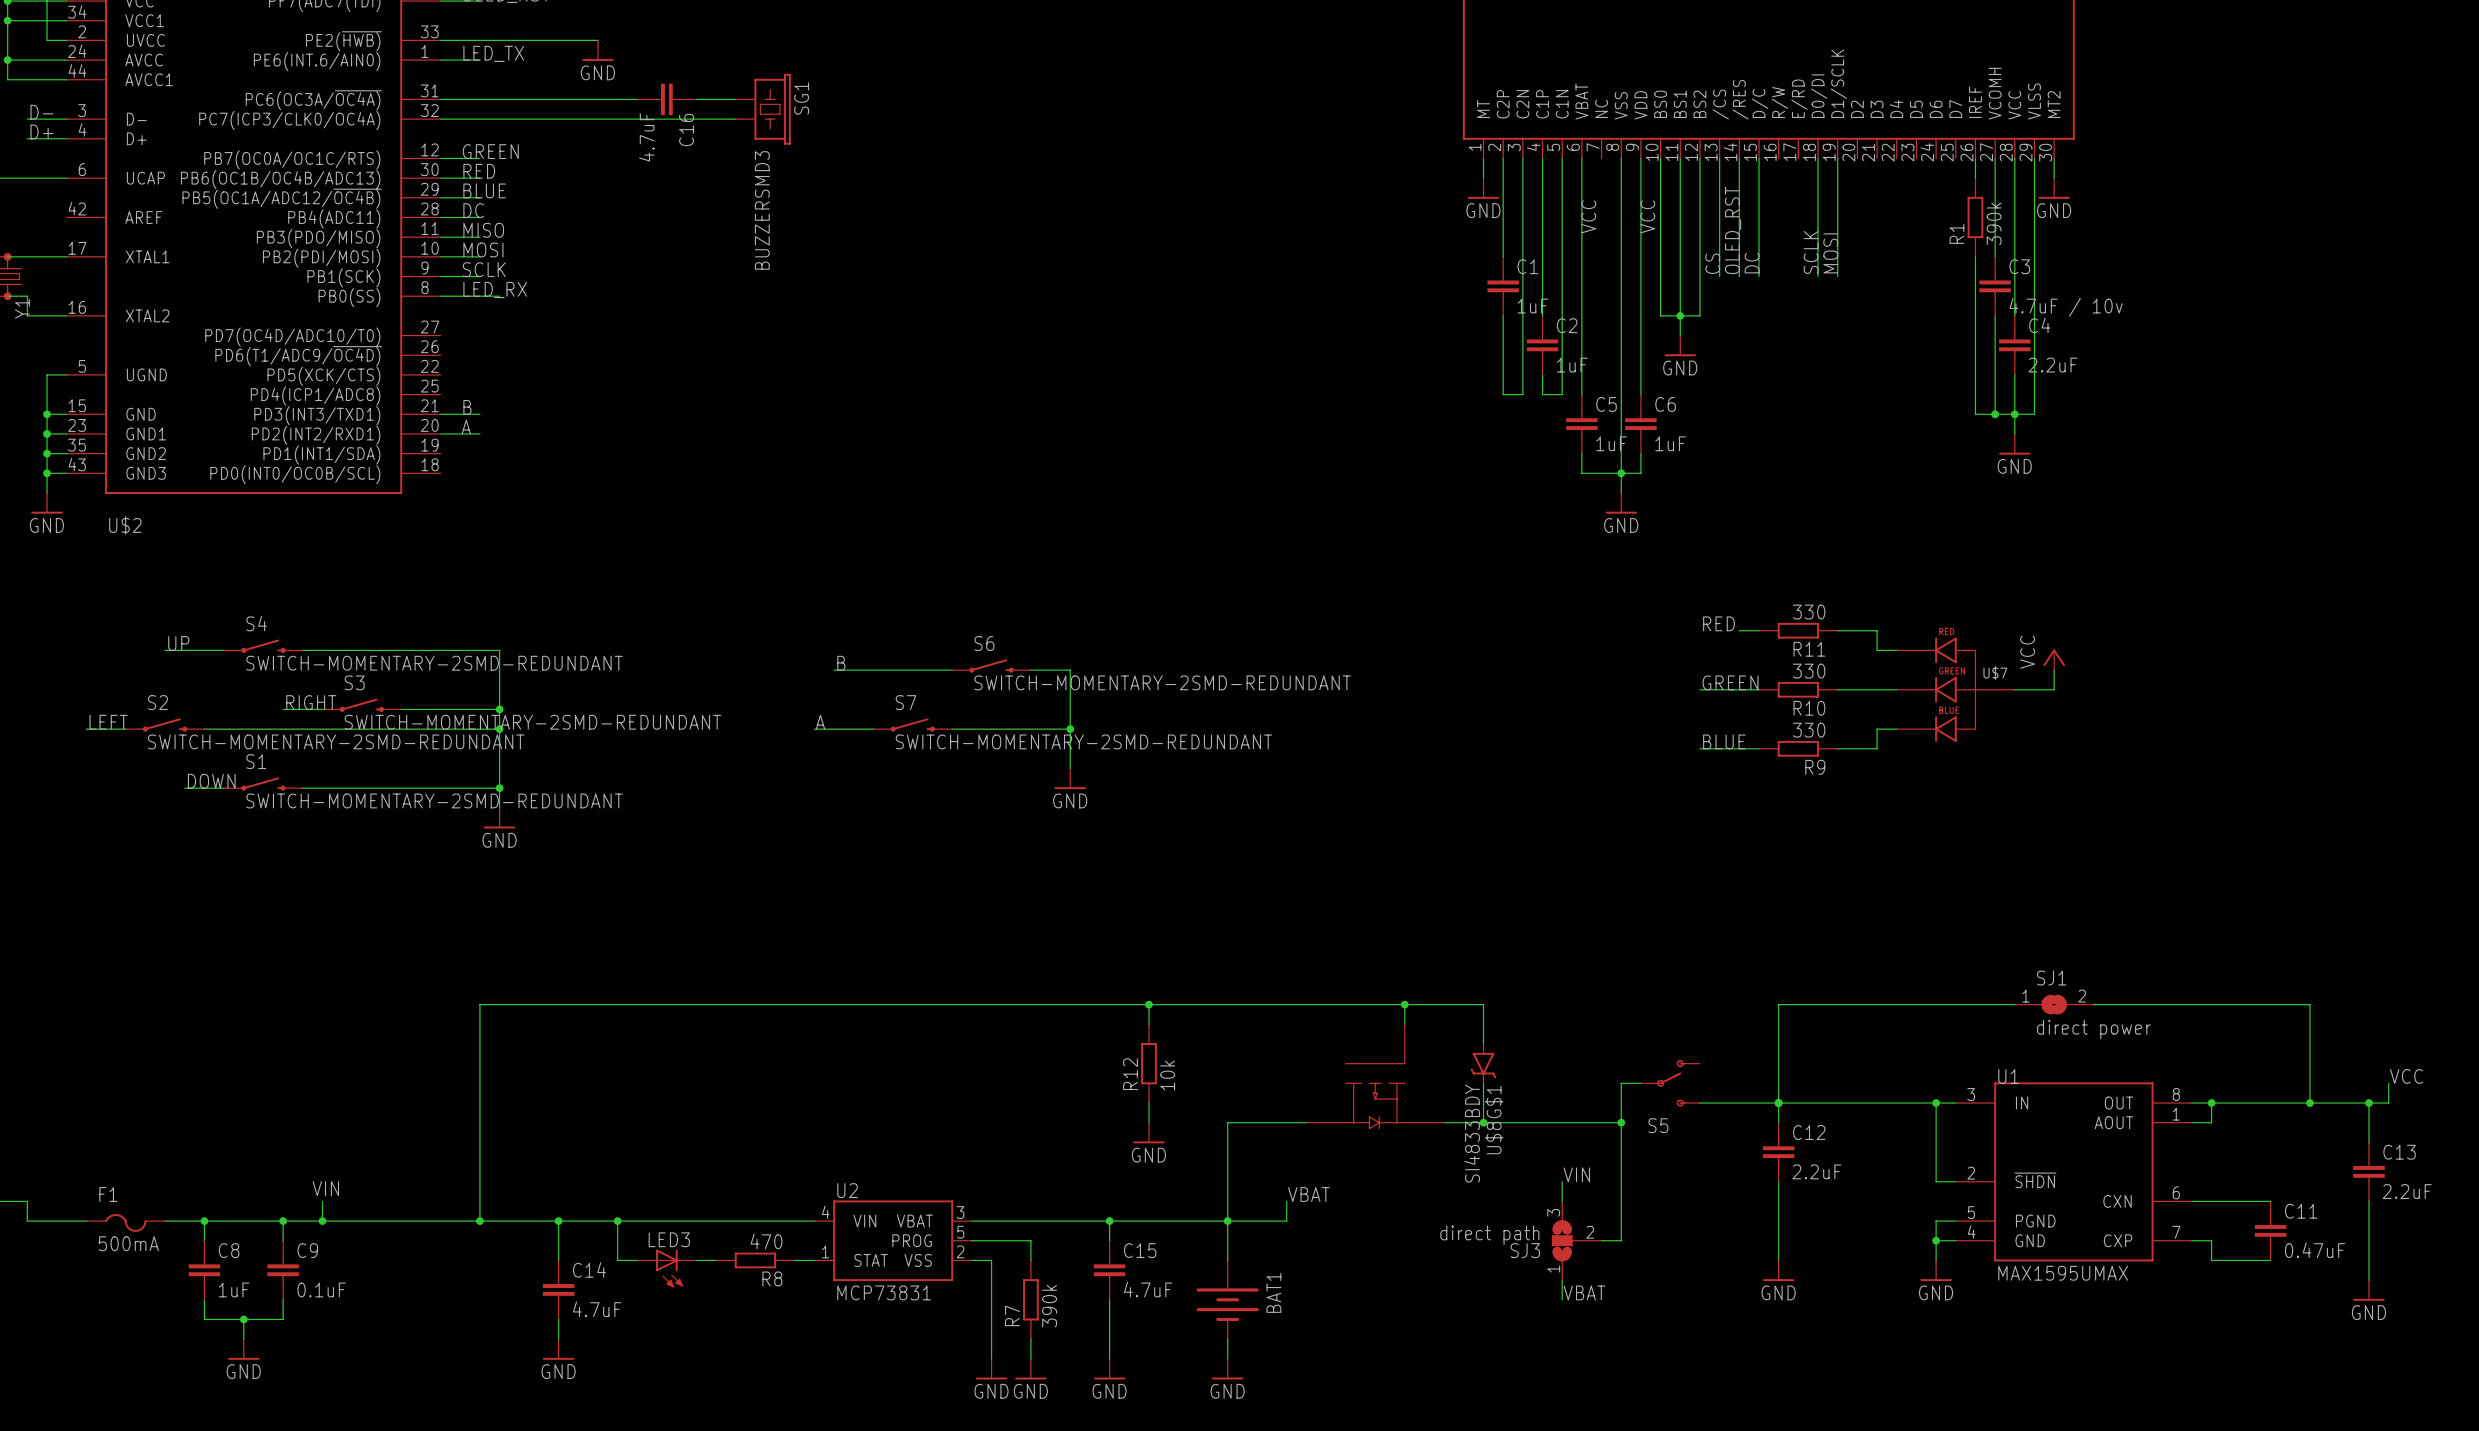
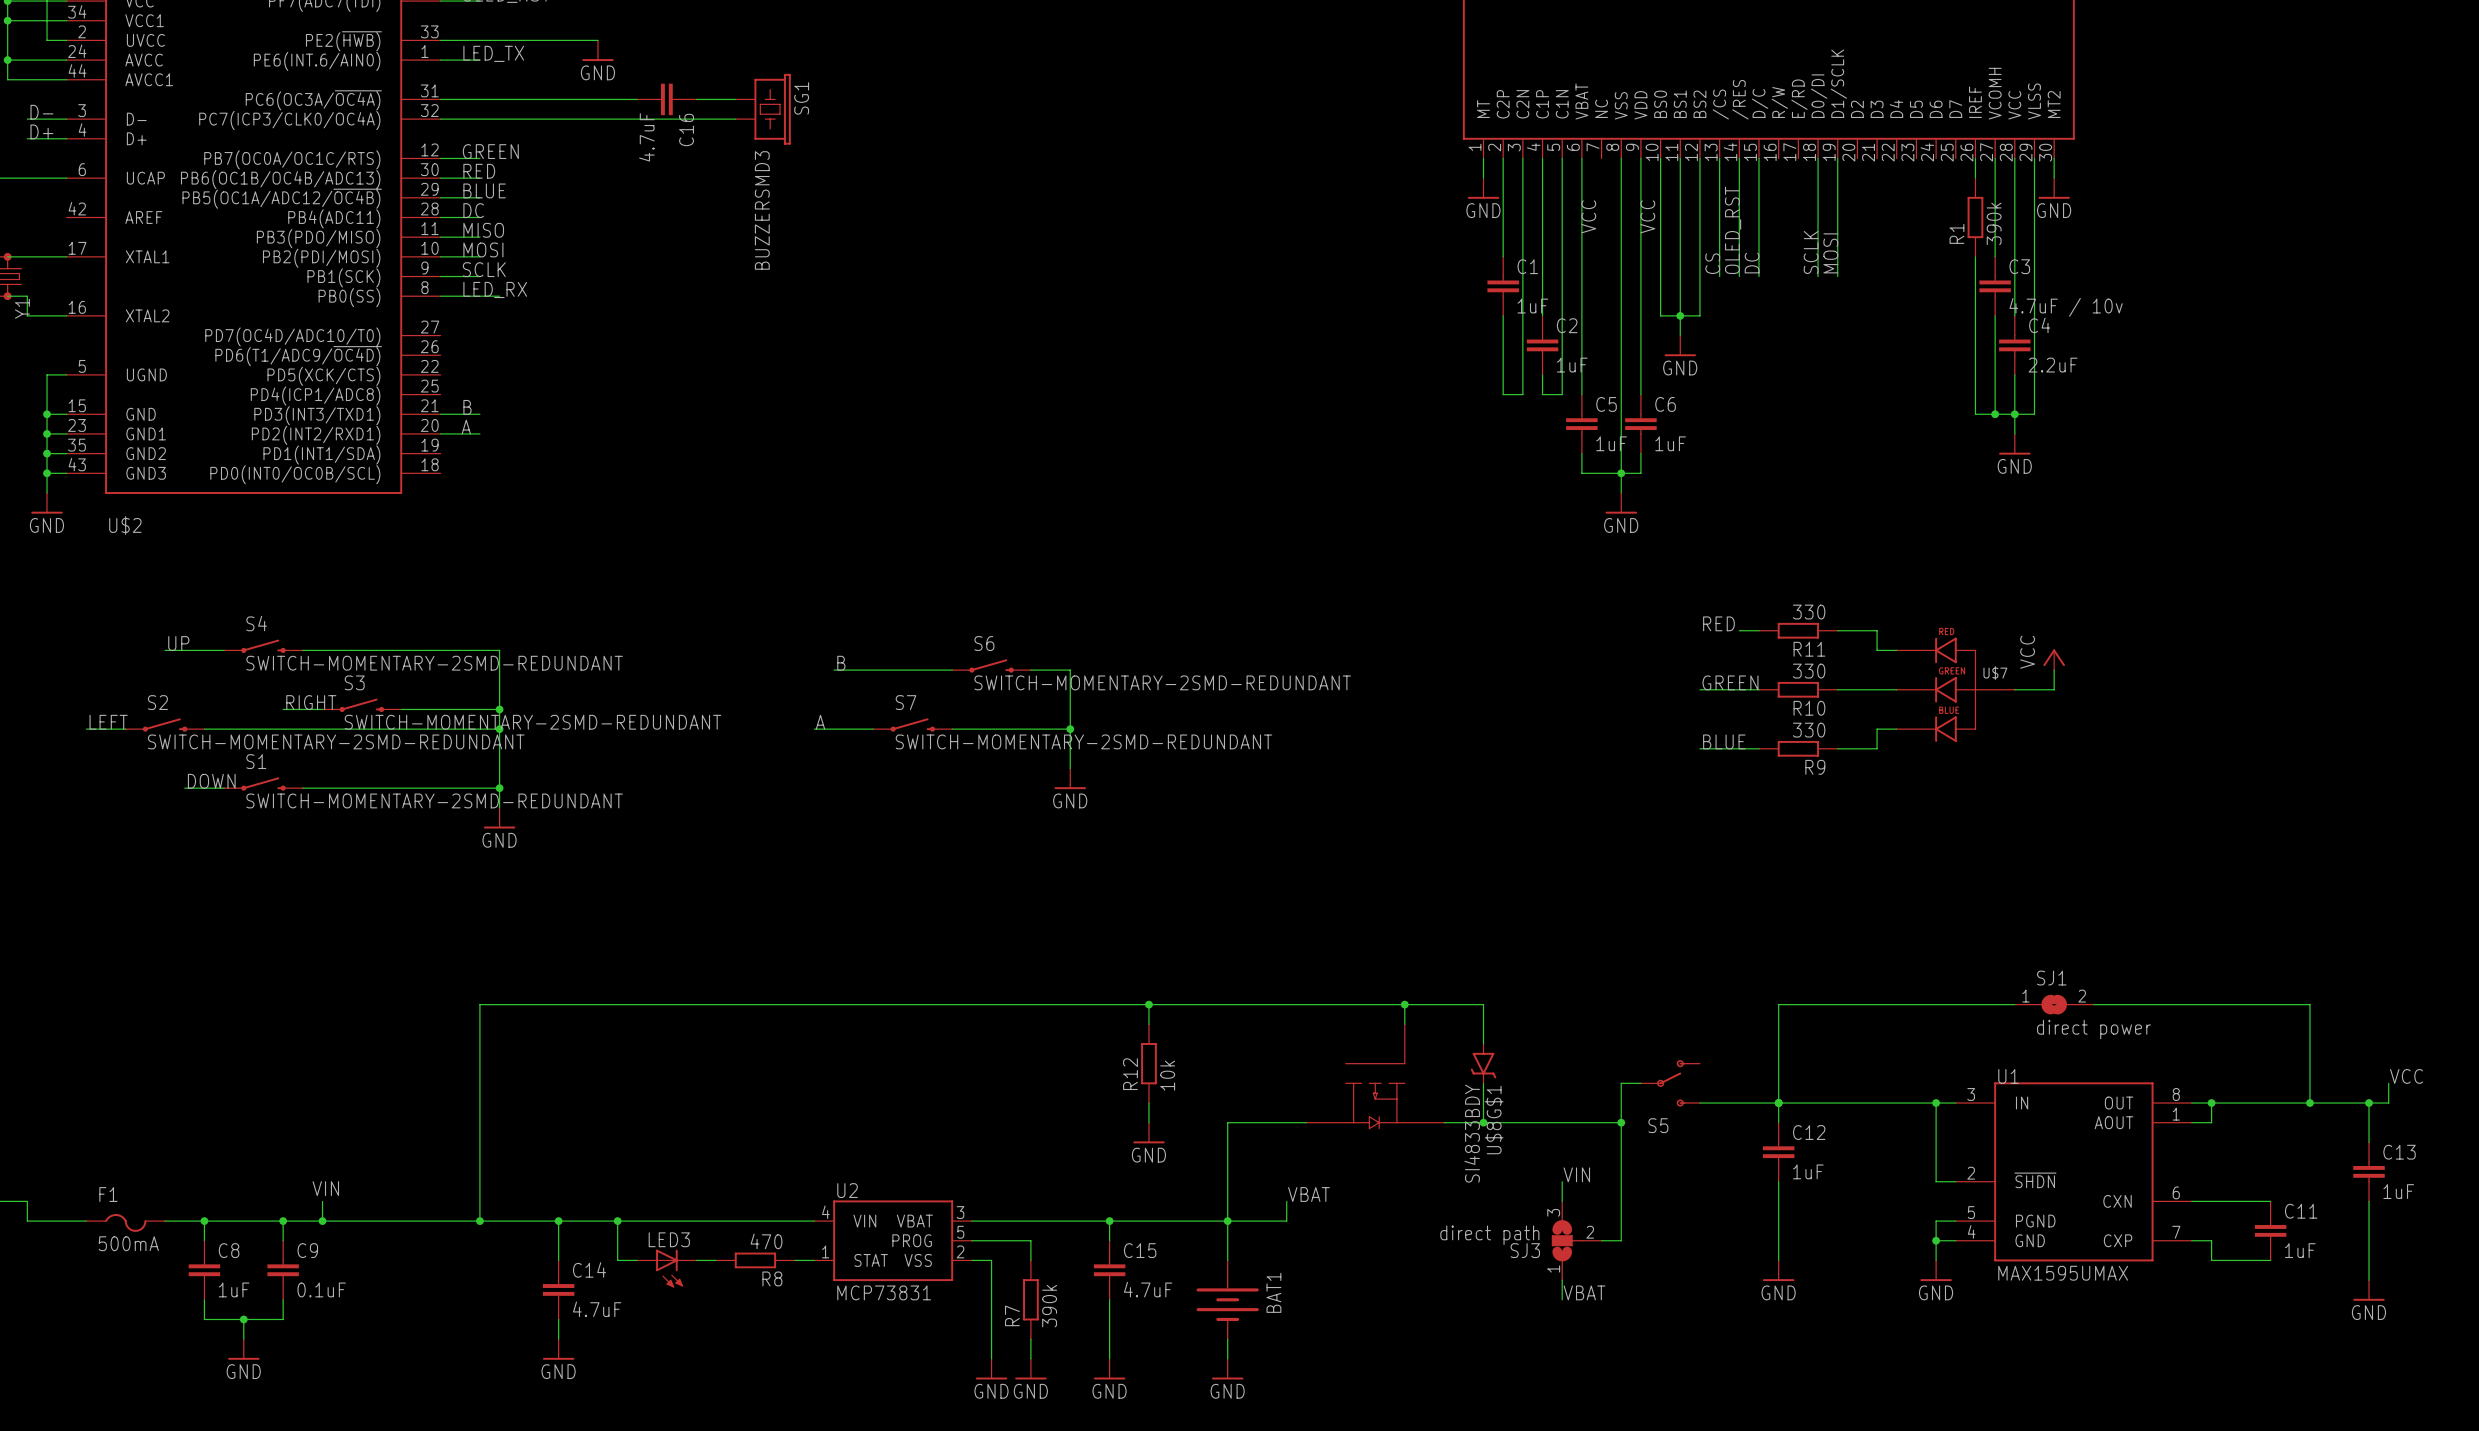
C12 value: 2.2uF (1816, 1171) -> 1uF (1808, 1171)
C13 value: 2.2uF (2407, 1191) -> 1uF (2398, 1191)
C11 value: 0.47uF (2315, 1250) -> 1uF (2300, 1250)

